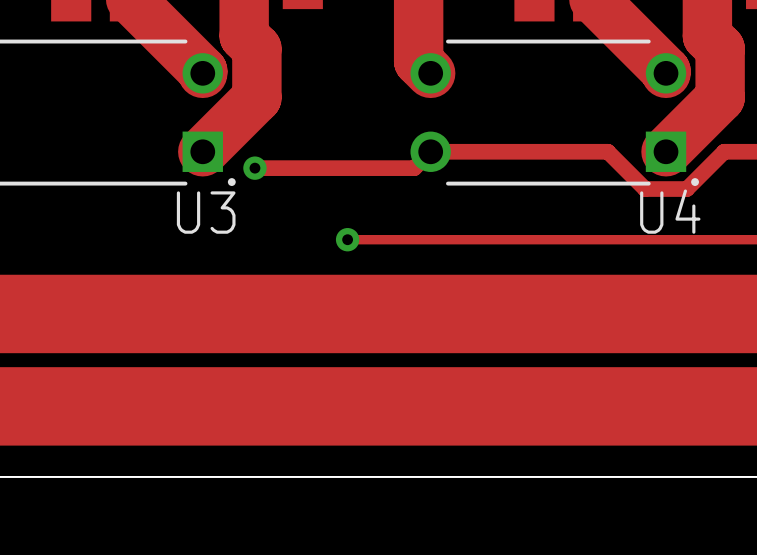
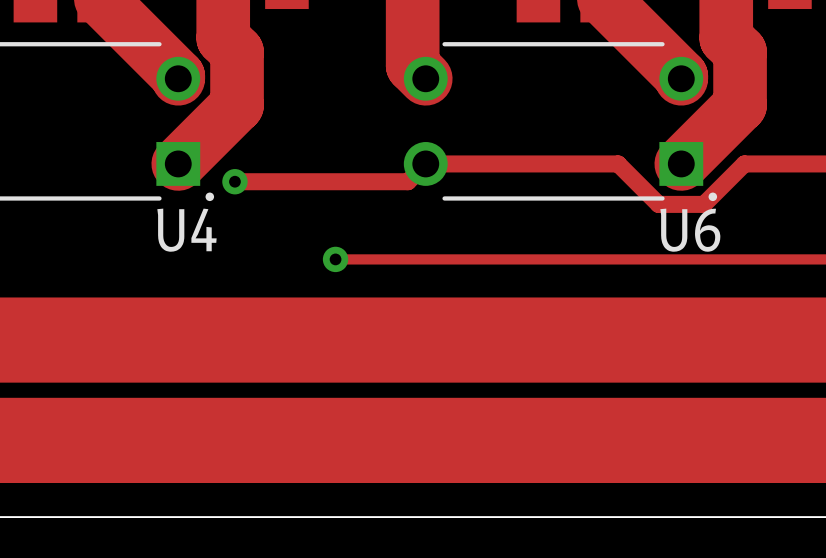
U4 name: U4 (670, 211) -> U6 (690, 230)
U3 name: U3 (206, 212) -> U4 (186, 230)

